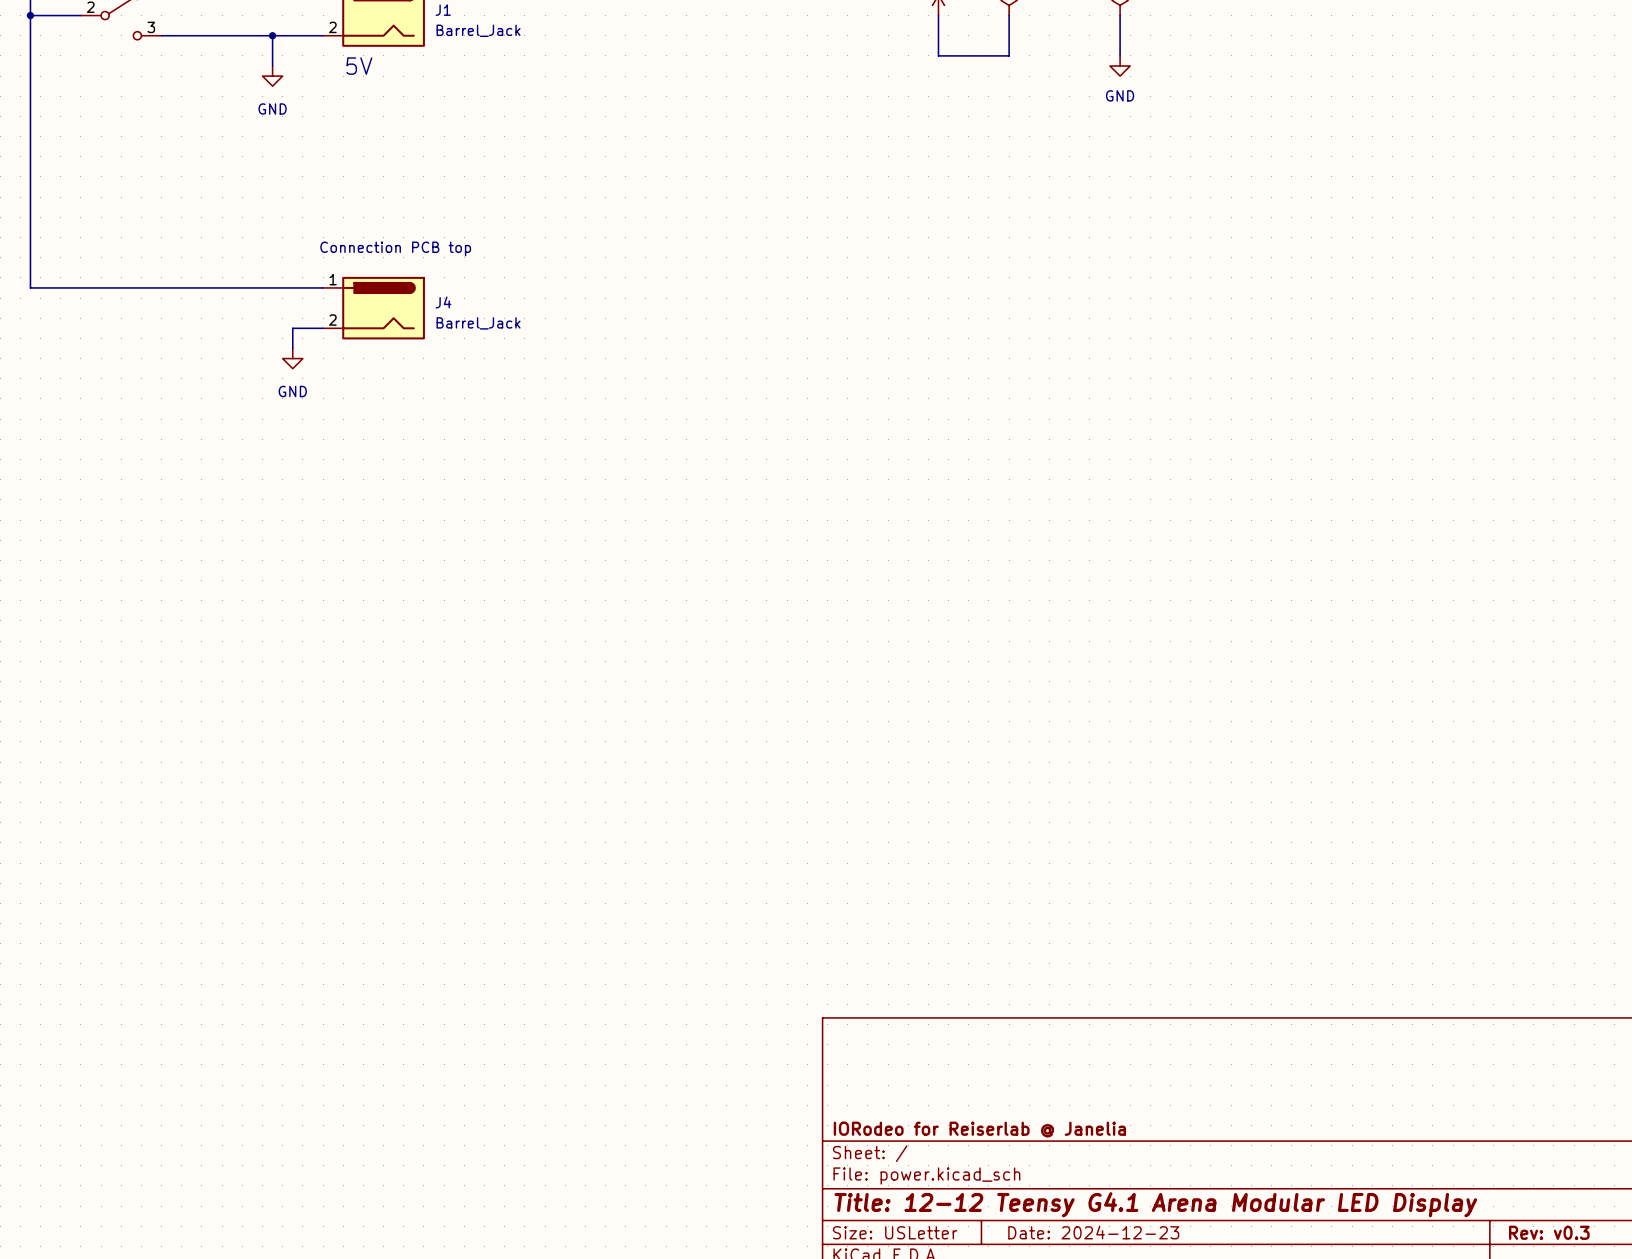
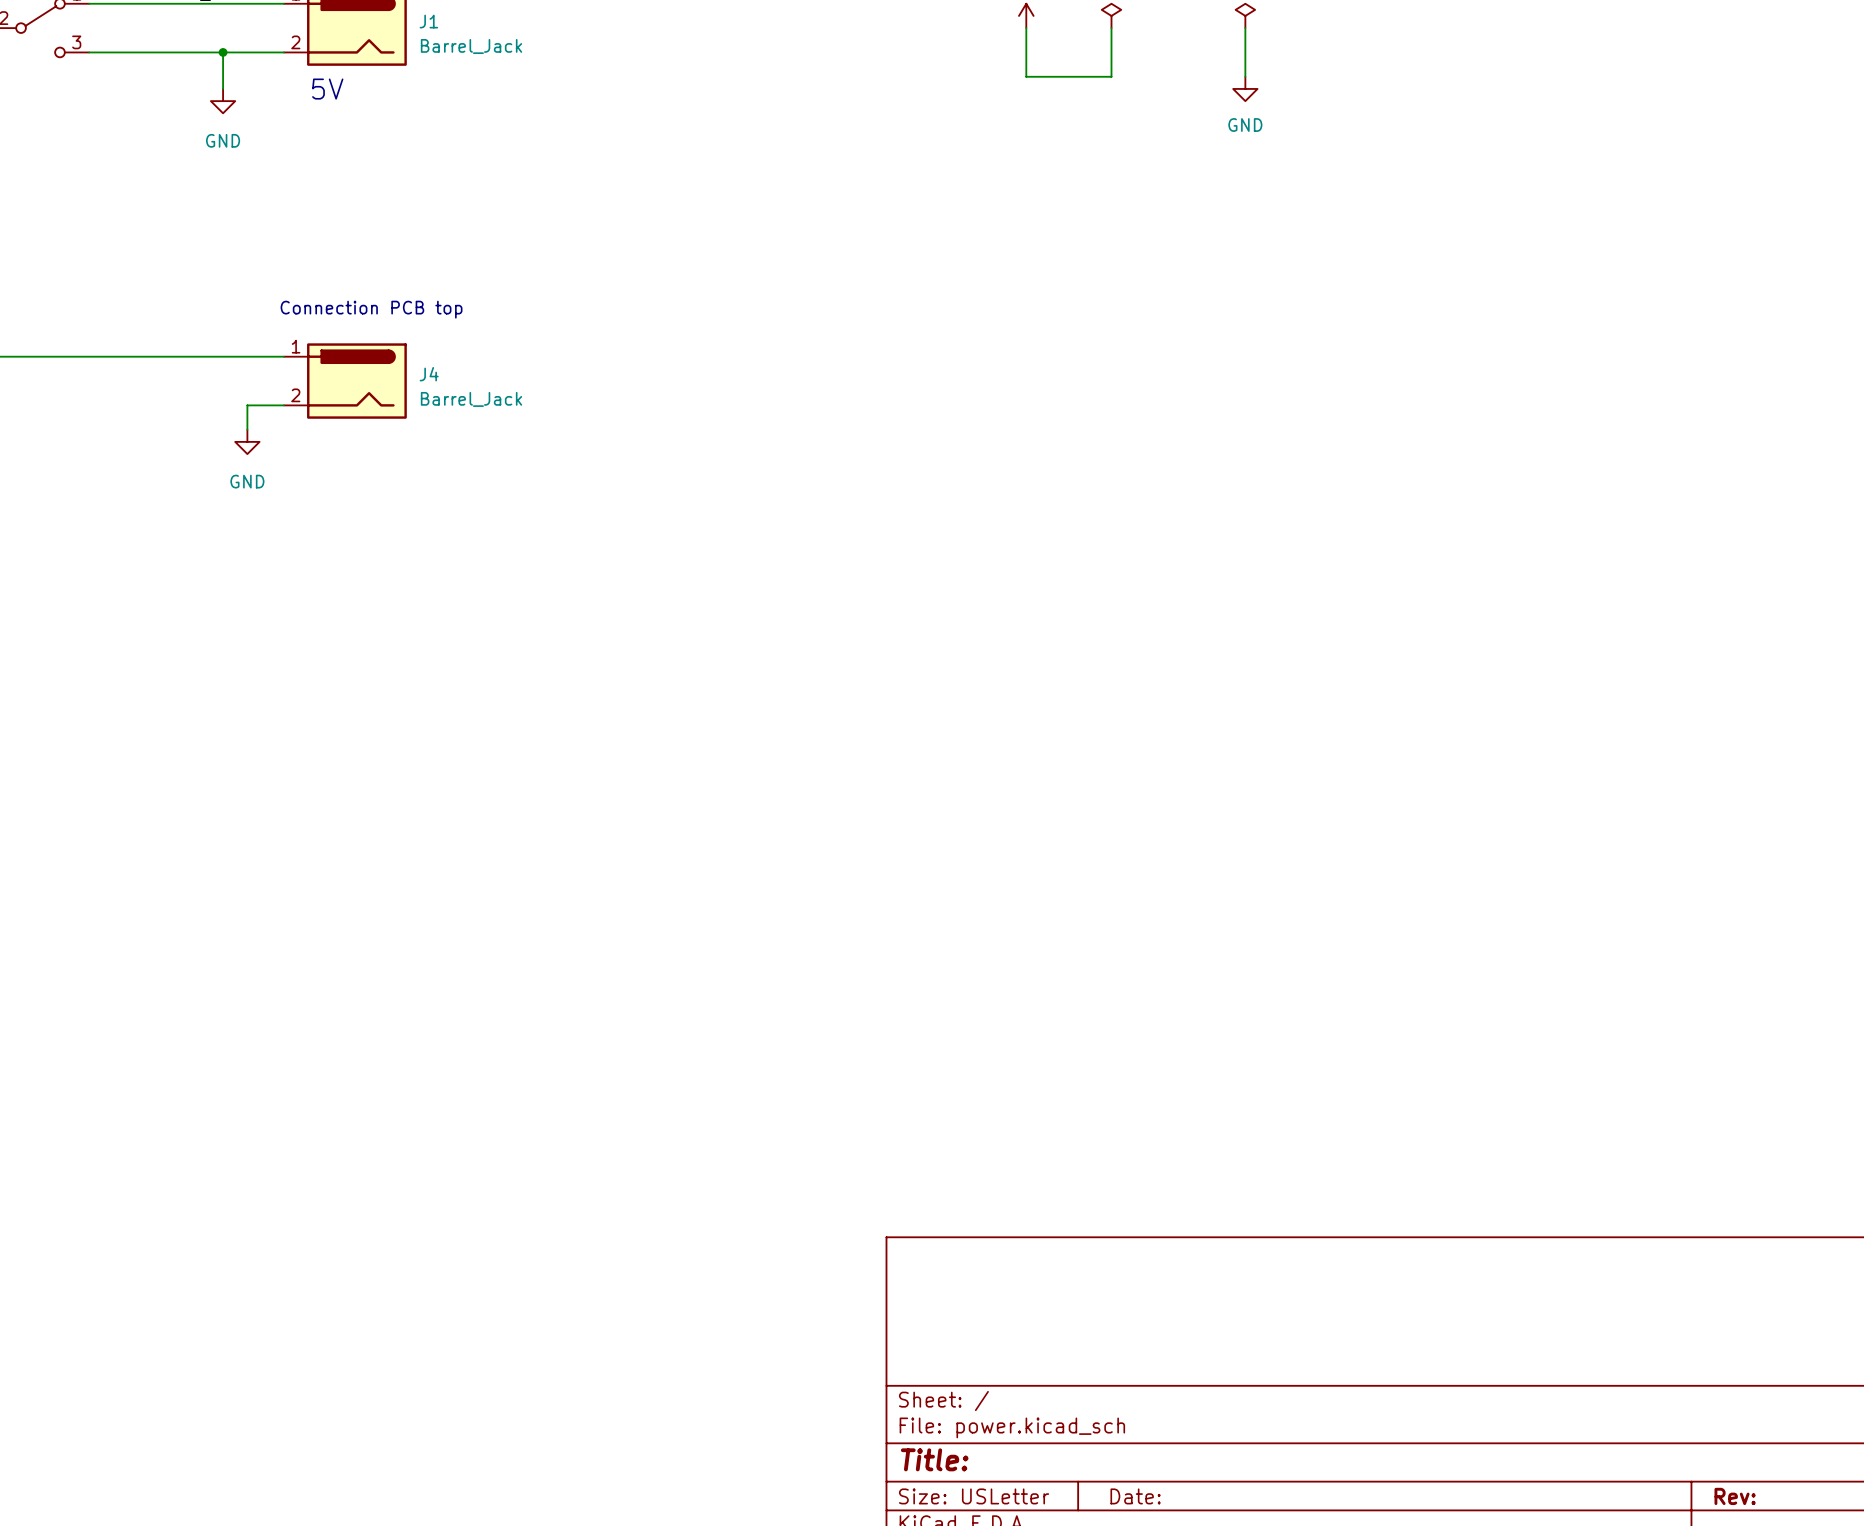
title block: IORodeo for Reiserlab @ Janelia (979, 1129) -> none
title block: Title: 12-12 Teensy G4.1 Arena Modular LED Display (1155, 1204) -> Title: (934, 1459)
title block: Date: 2024-12-23 (1093, 1232) -> Date: (1135, 1496)
title block: Rev: v0.3 (1549, 1232) -> Rev: (1735, 1496)

